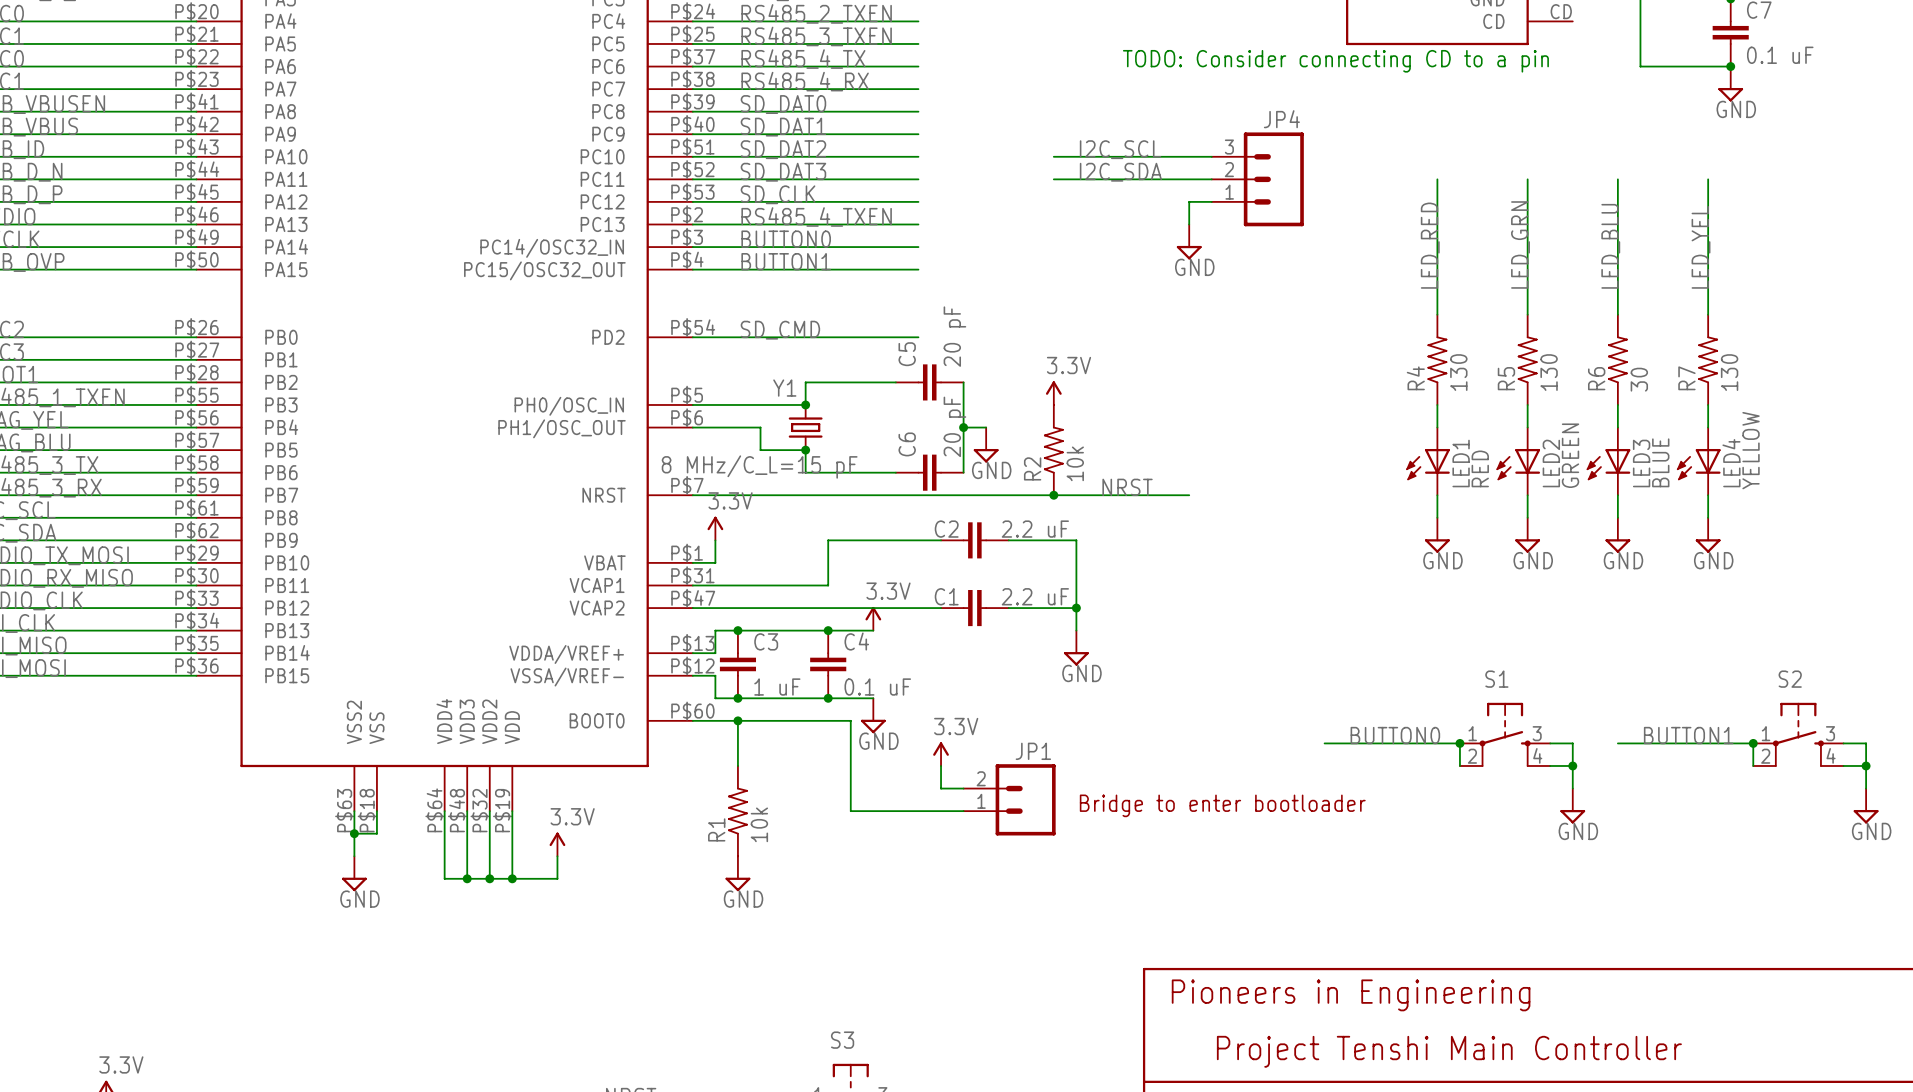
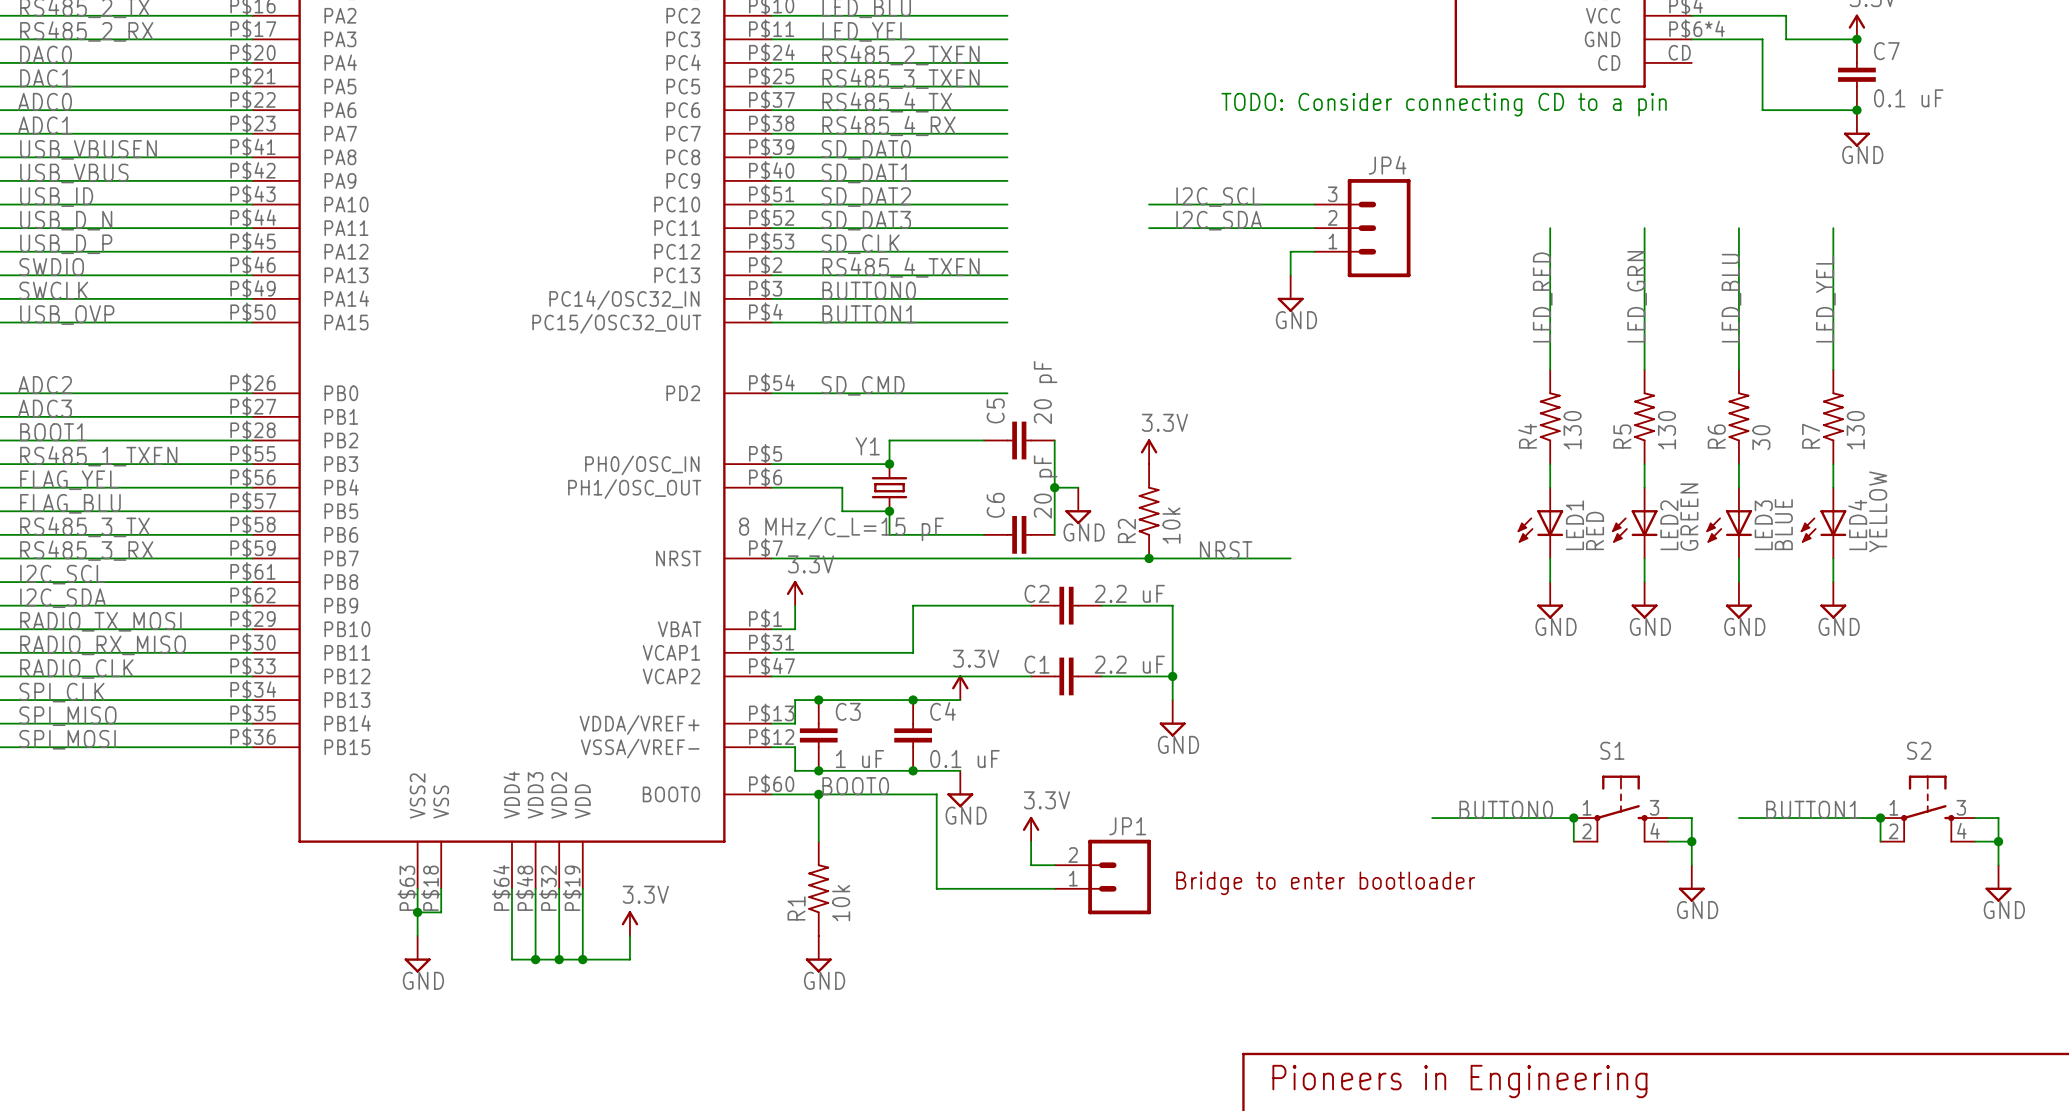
label: none -> BOOT0 (855, 786)

